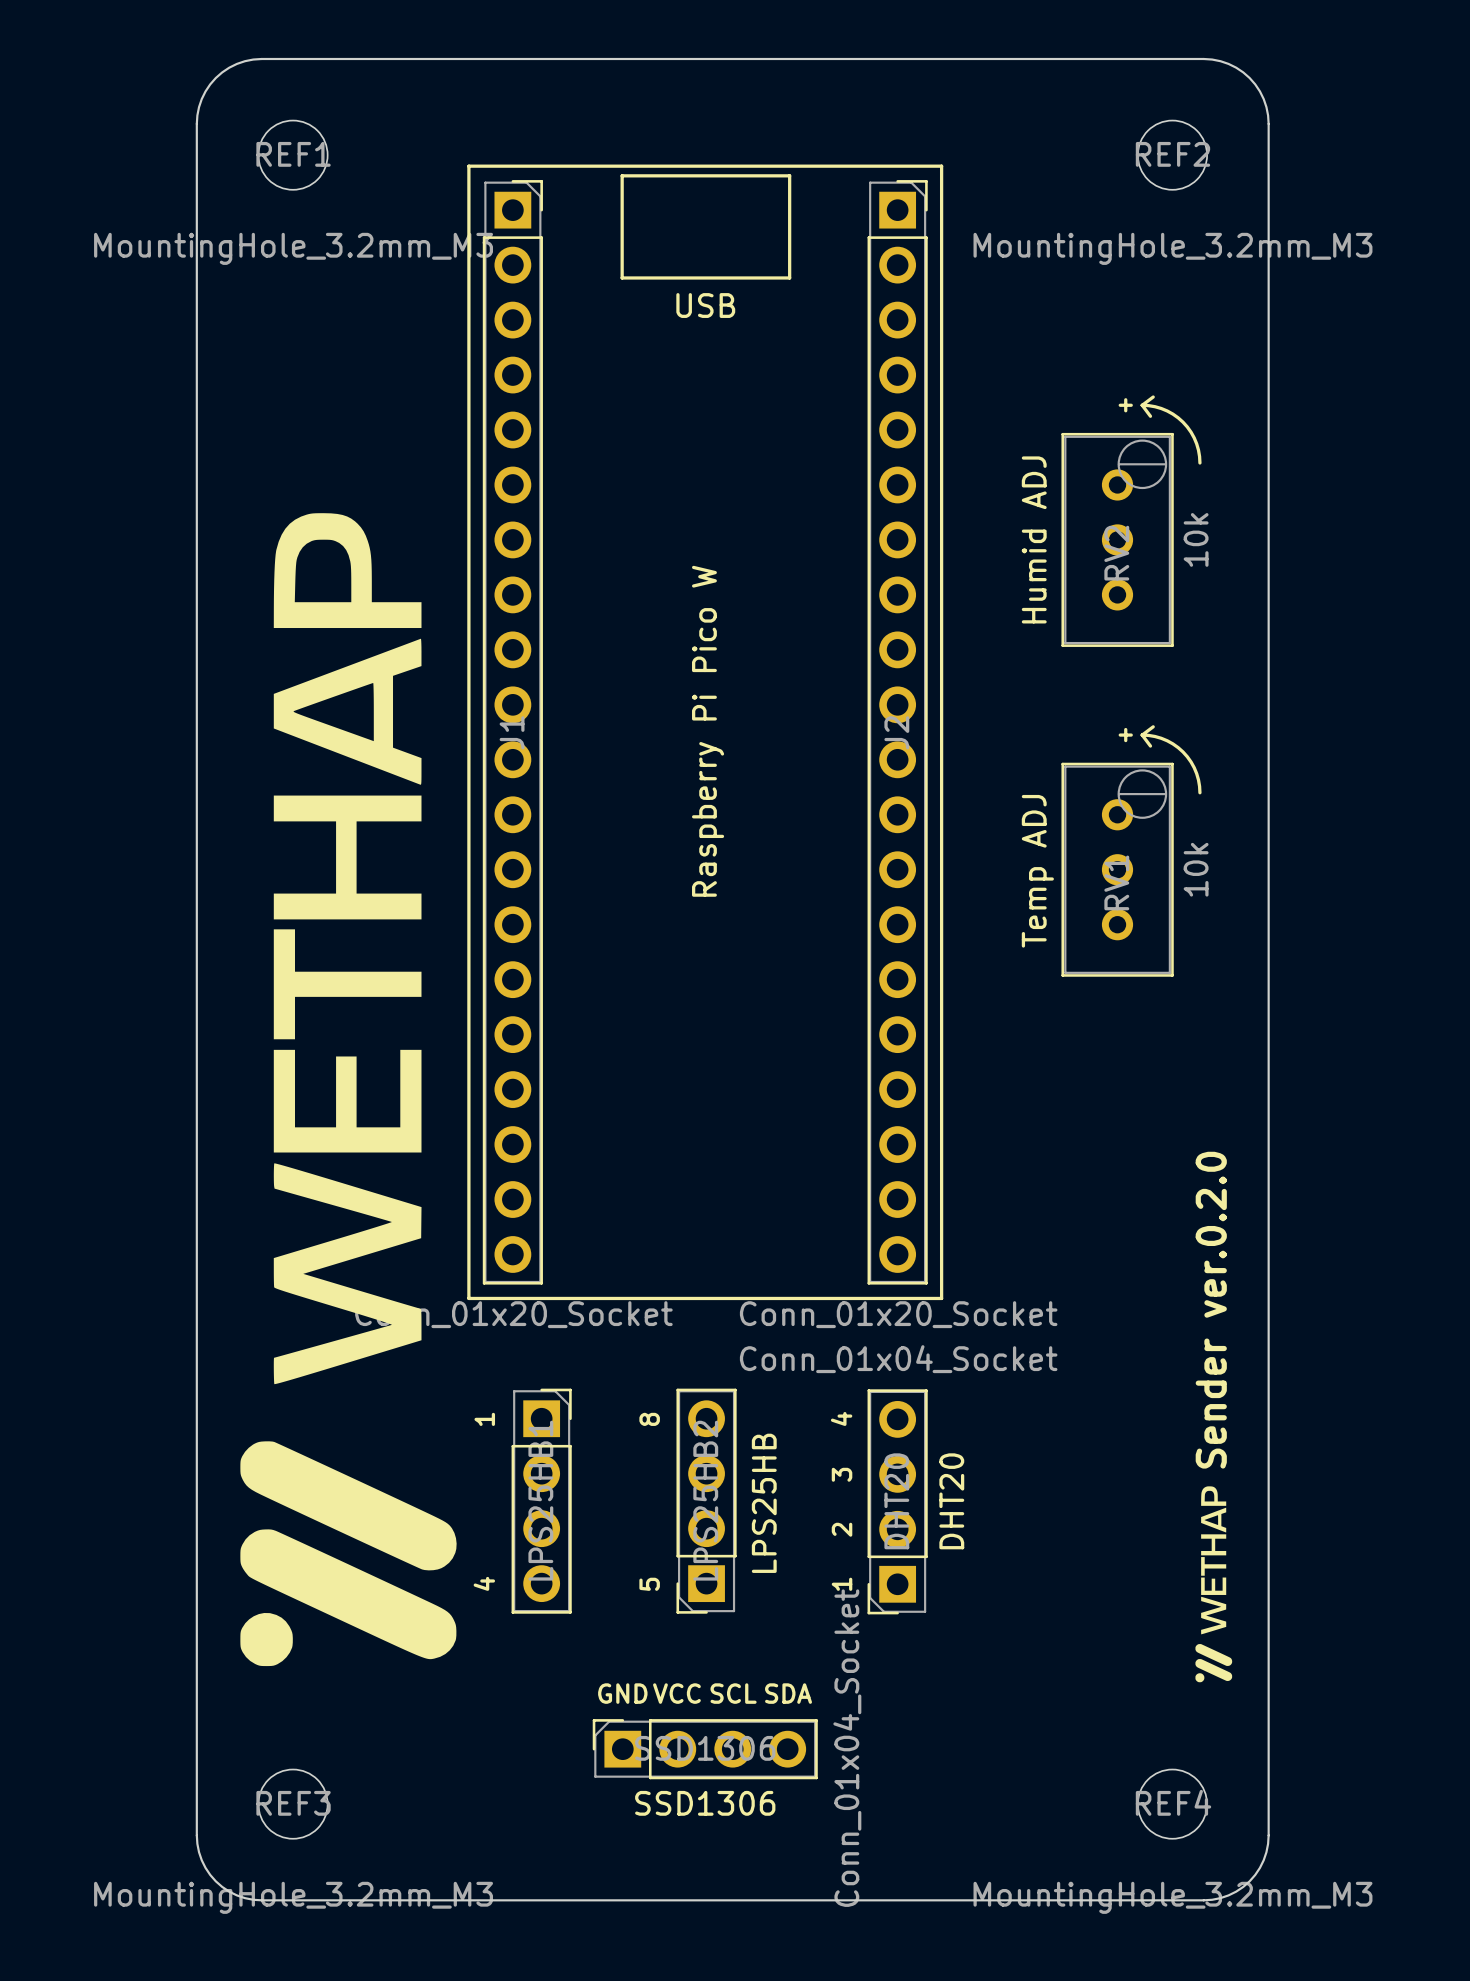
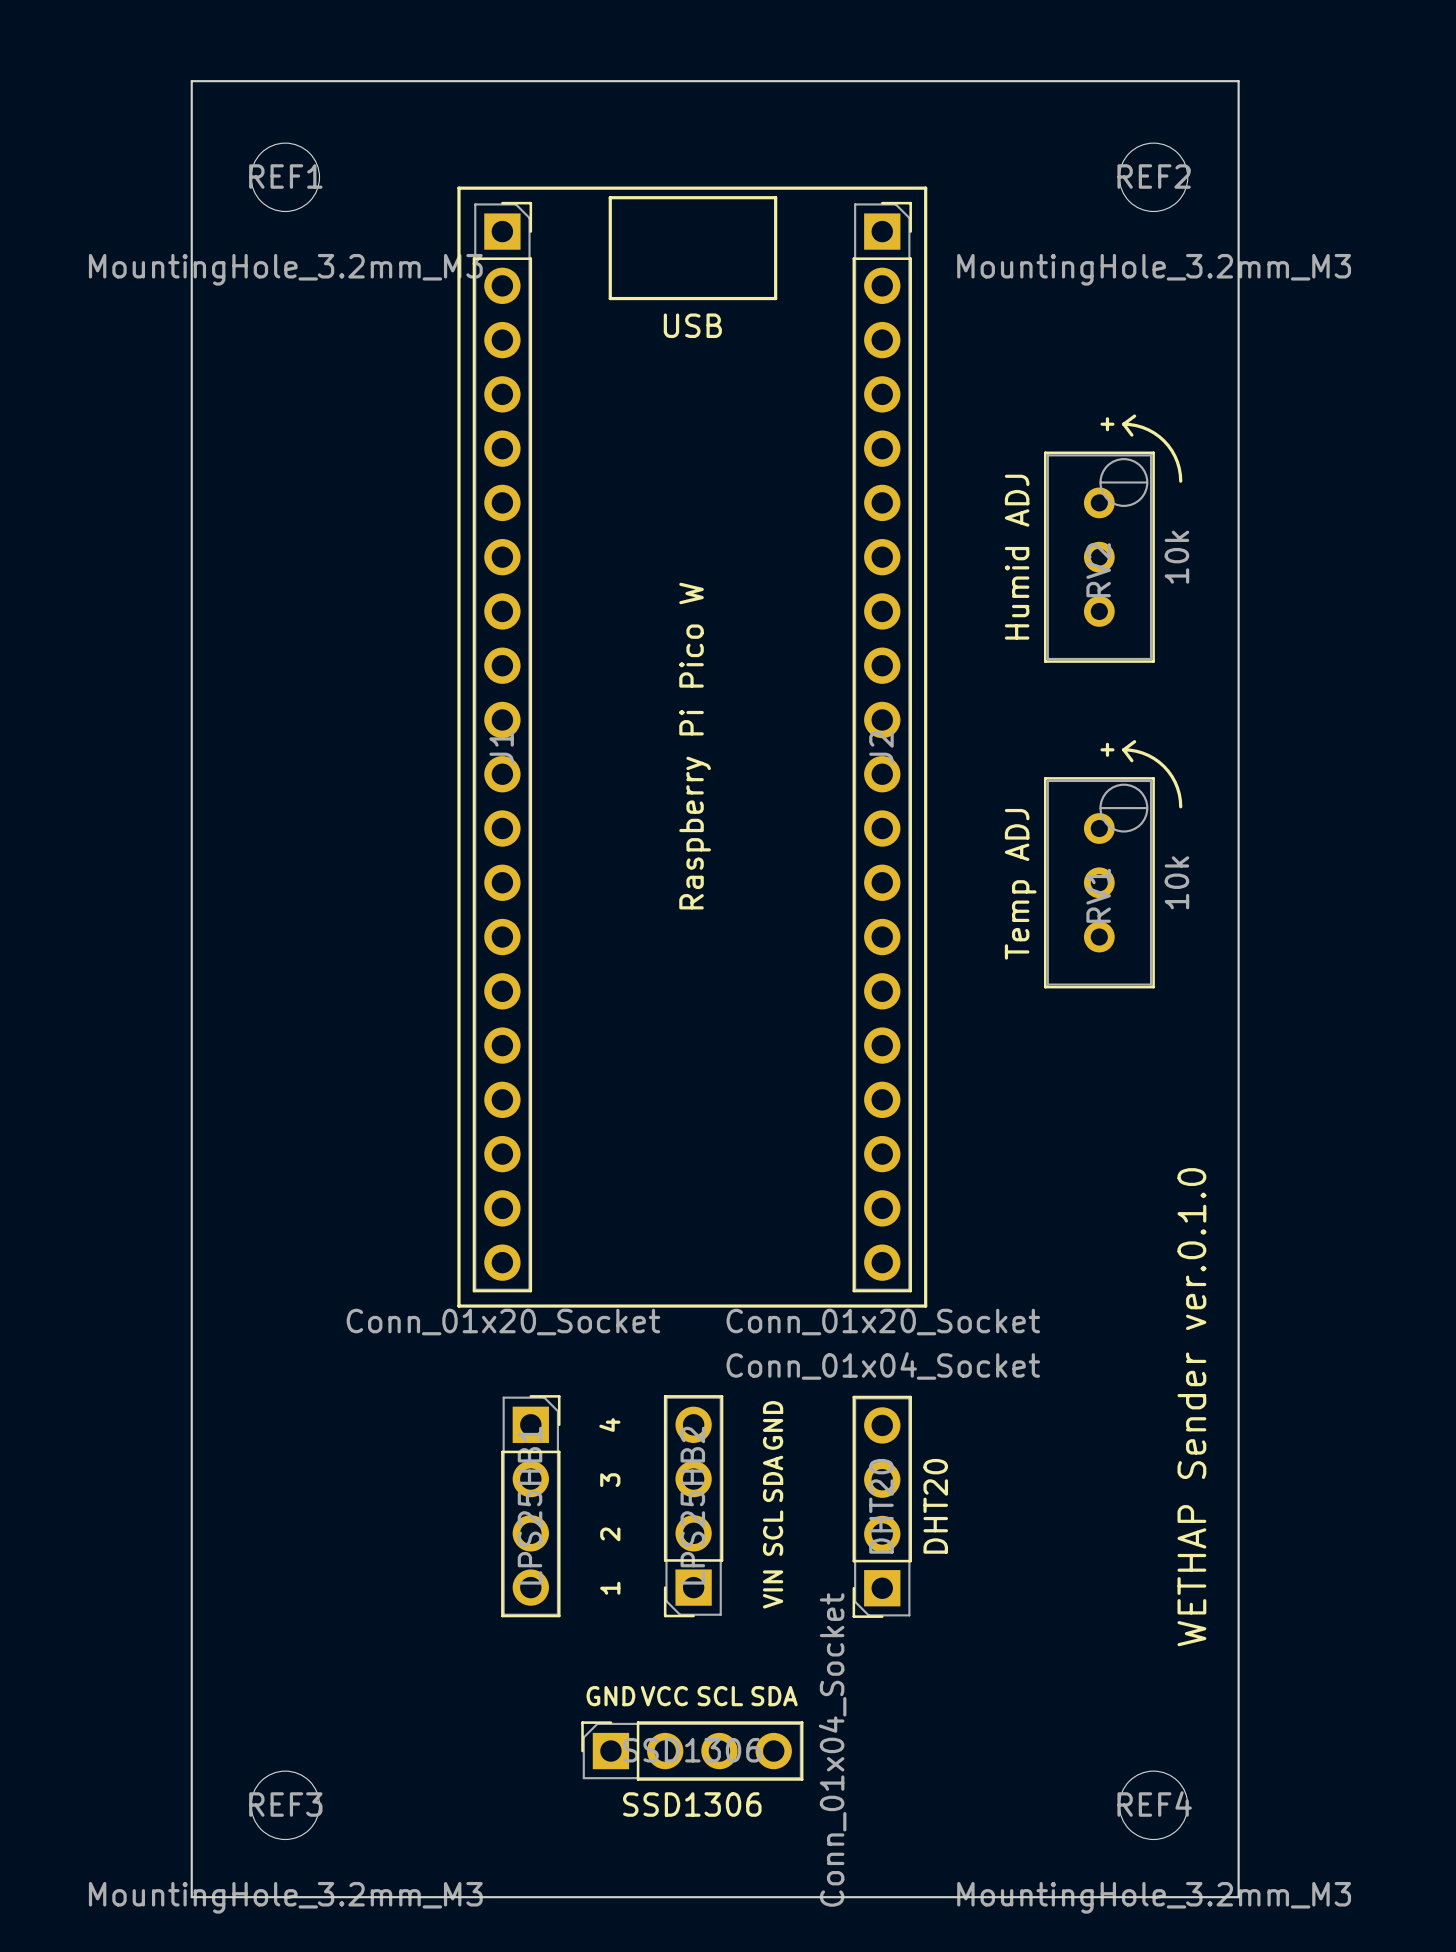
board edge: (261, 58) (1203, 58) (1220, 61) (1236, 67) (1249, 78) (1259, 91) (1266, 107) (1268, 123) (1268, 1835) (1266, 1852) (1259, 1867) (1249, 1881) (1236, 1891) (1220, 1898) (1203, 1900) (261, 1900) (244, 1898) (229, 1891) (215, 1881) (205, 1867) (199, 1852) (196, 1835) (196, 123) (201, 99) (215, 78) (236, 63) (261, 58) -> (191, 81) (191, 1897) (1238, 1897) (1238, 81) (191, 81)
drawing: [240, 513, 457, 1667] -> none
text: Sender ver.0.2.0 (1211, 1310) -> WETHAP Sender ver.0.1.0 (1191, 1407)
text: none -> 4 (609, 1425)
text: 4 (841, 1418) -> none
text: 1 (484, 1419) -> none
text: 8 (649, 1419) -> none
text: none -> GND (773, 1425)
text: none -> SDA (773, 1478)
text position: 3 (842, 1474) -> 3 (610, 1480)
drawing: [1195, 1486, 1233, 1683] -> none
text: LPS25HB (764, 1503) -> none
text: none -> SCL (773, 1533)
text position: 2 (842, 1529) -> 2 (610, 1534)
text: 4 (484, 1583) -> none
text: none -> 1 (610, 1588)
text: 5 (649, 1584) -> none
text: 1 (842, 1584) -> none
text: none -> VIN (773, 1589)

